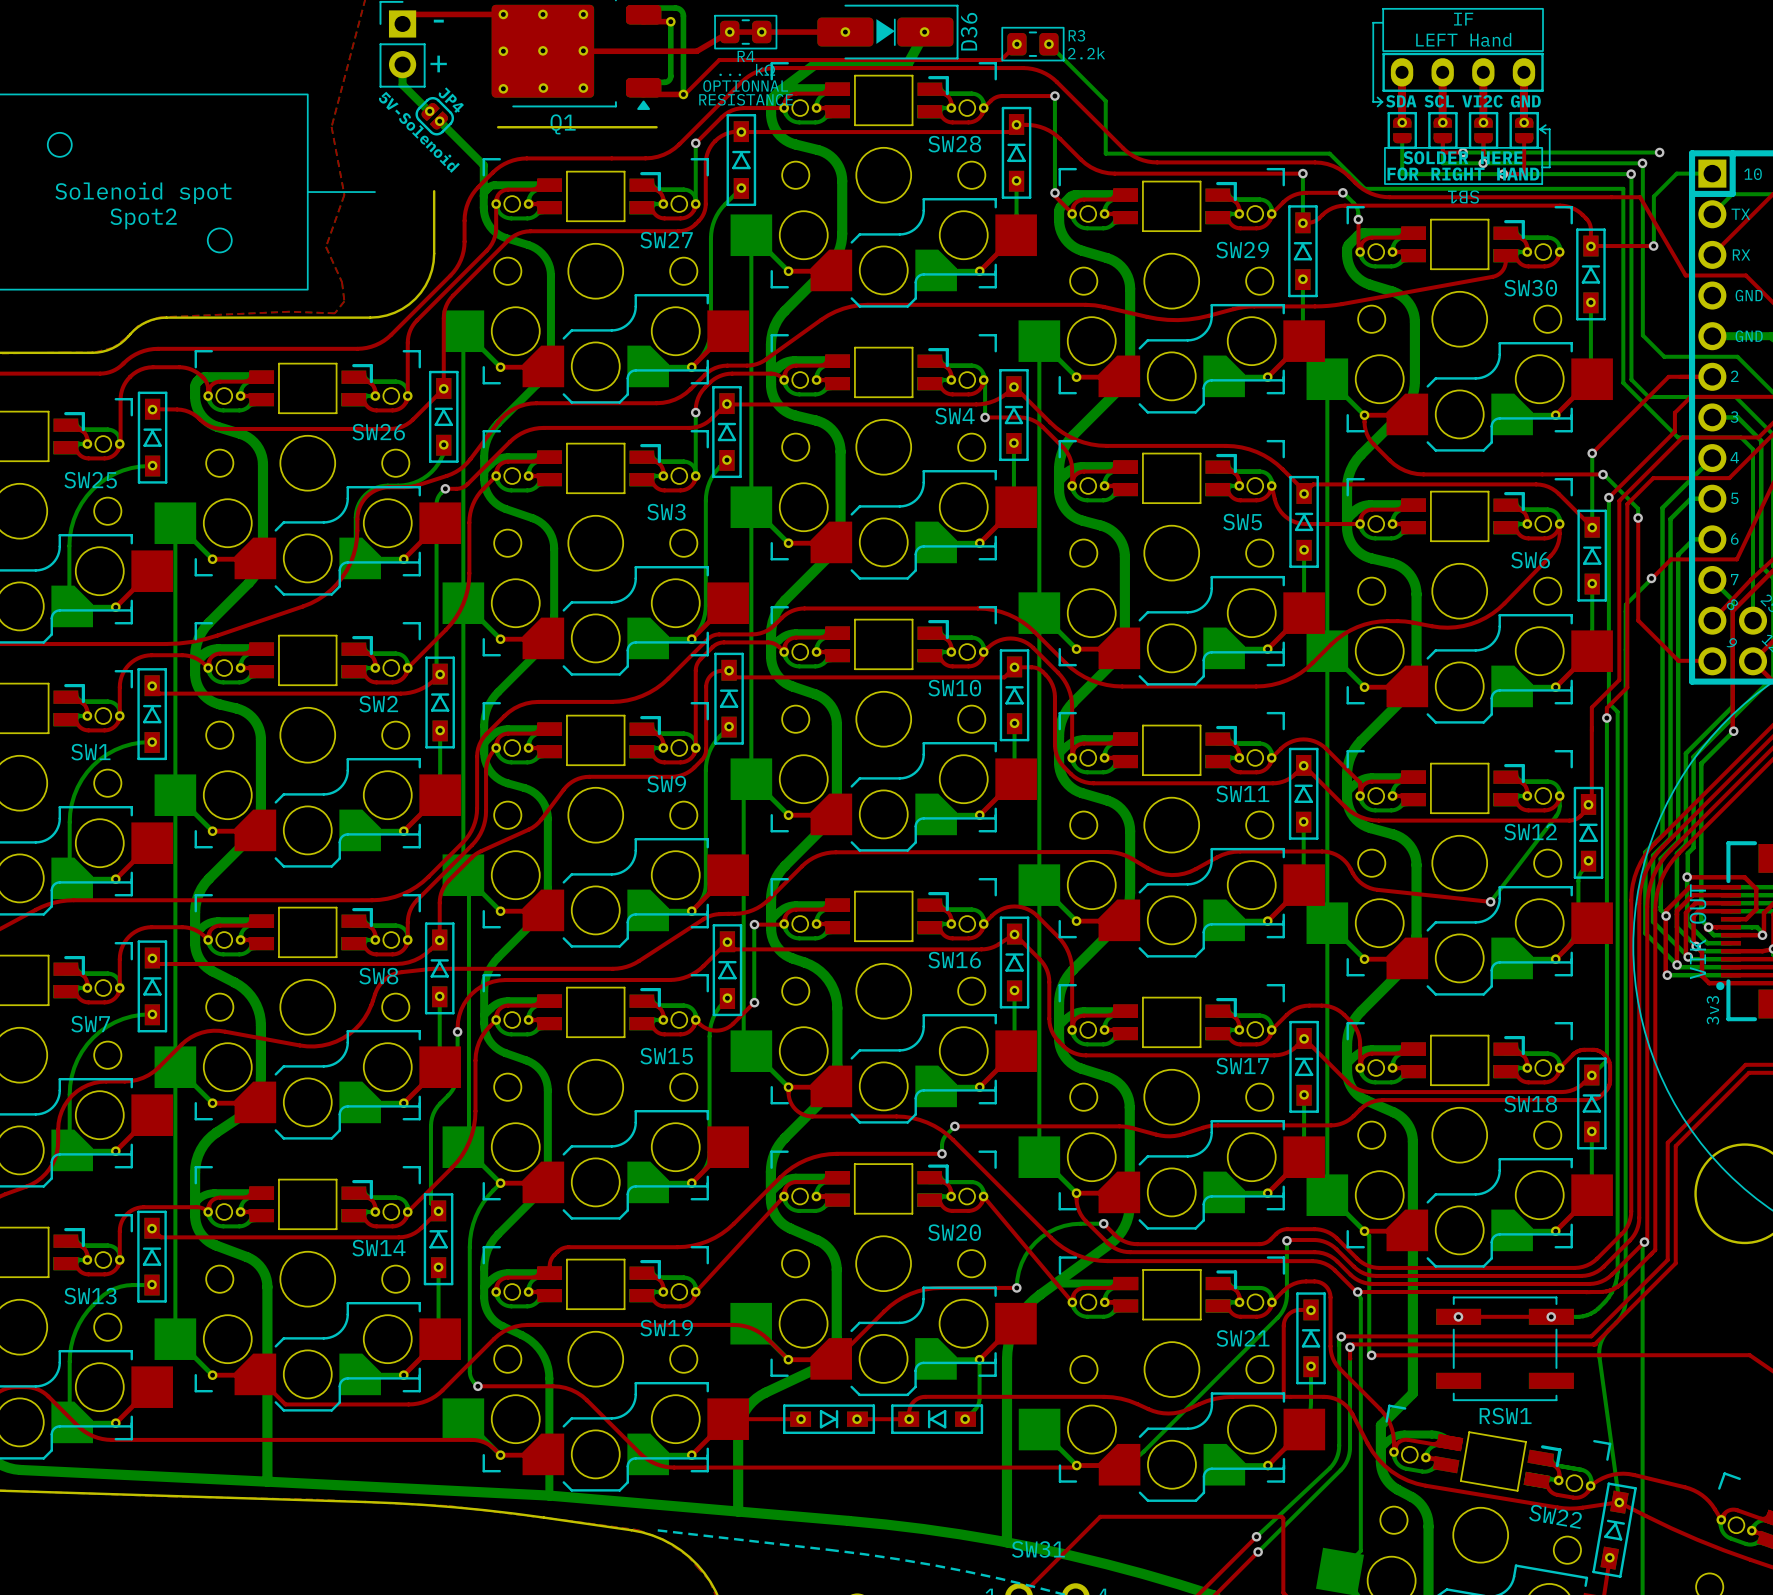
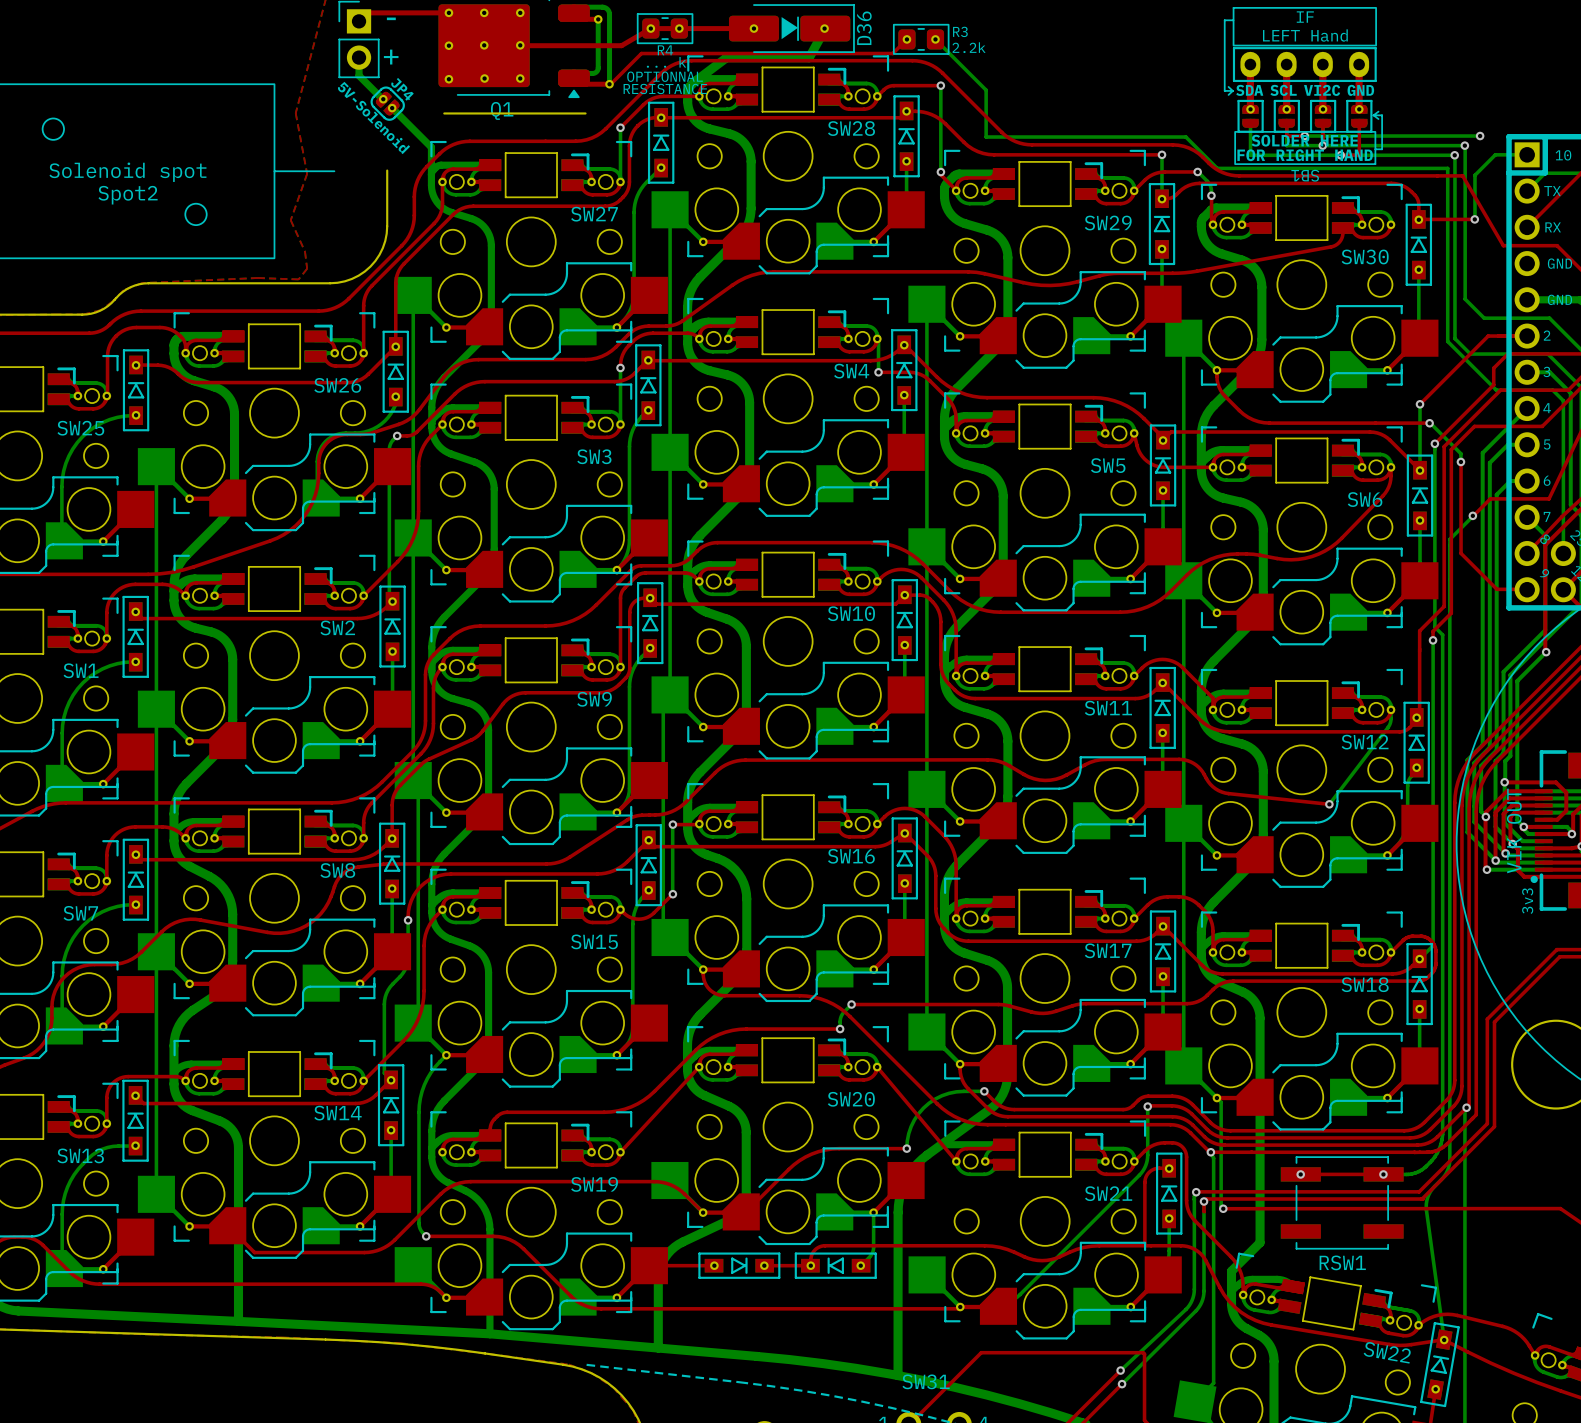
R4 value: ... kΩ (747, 69) -> ... k (666, 62)

